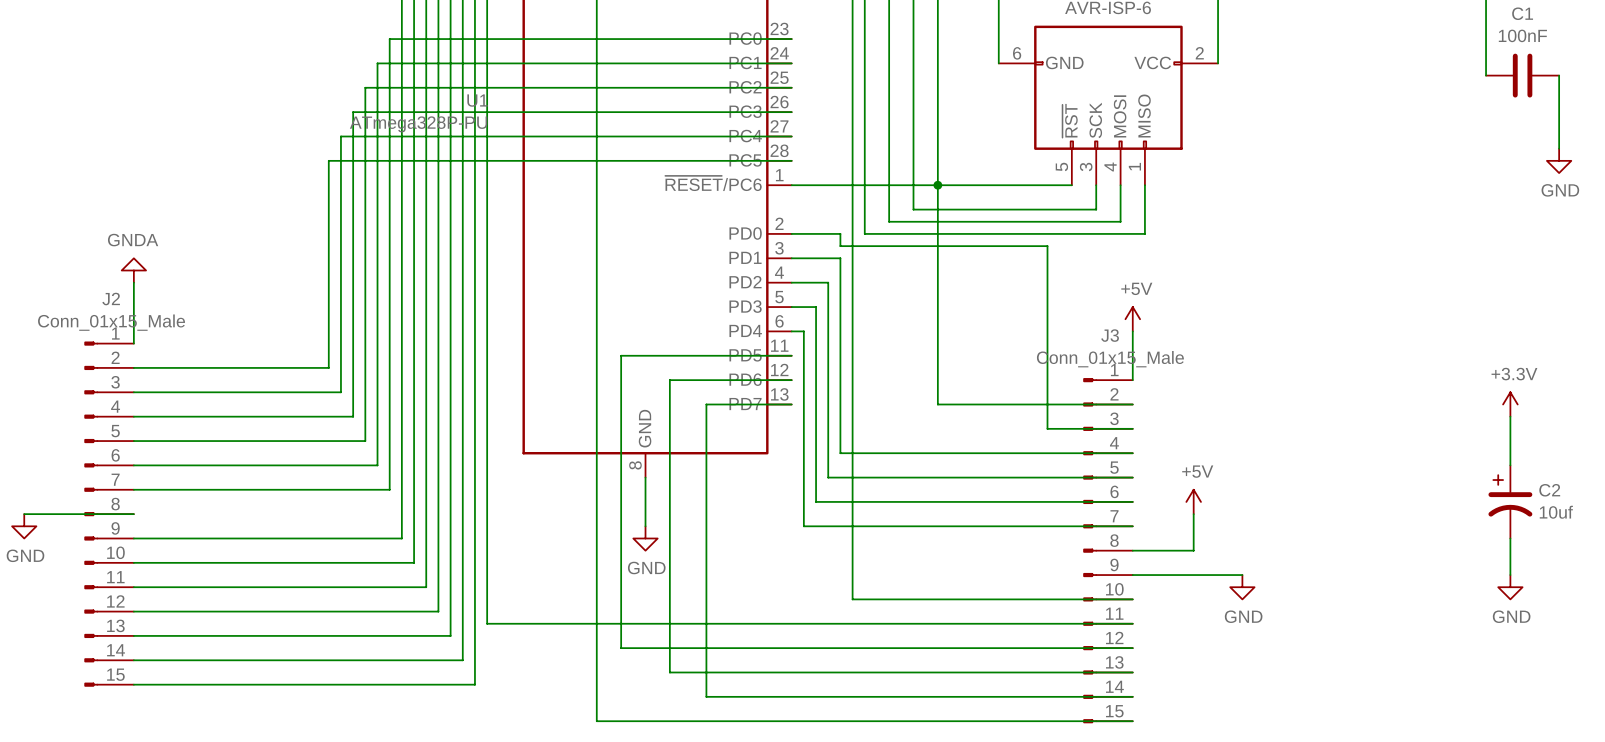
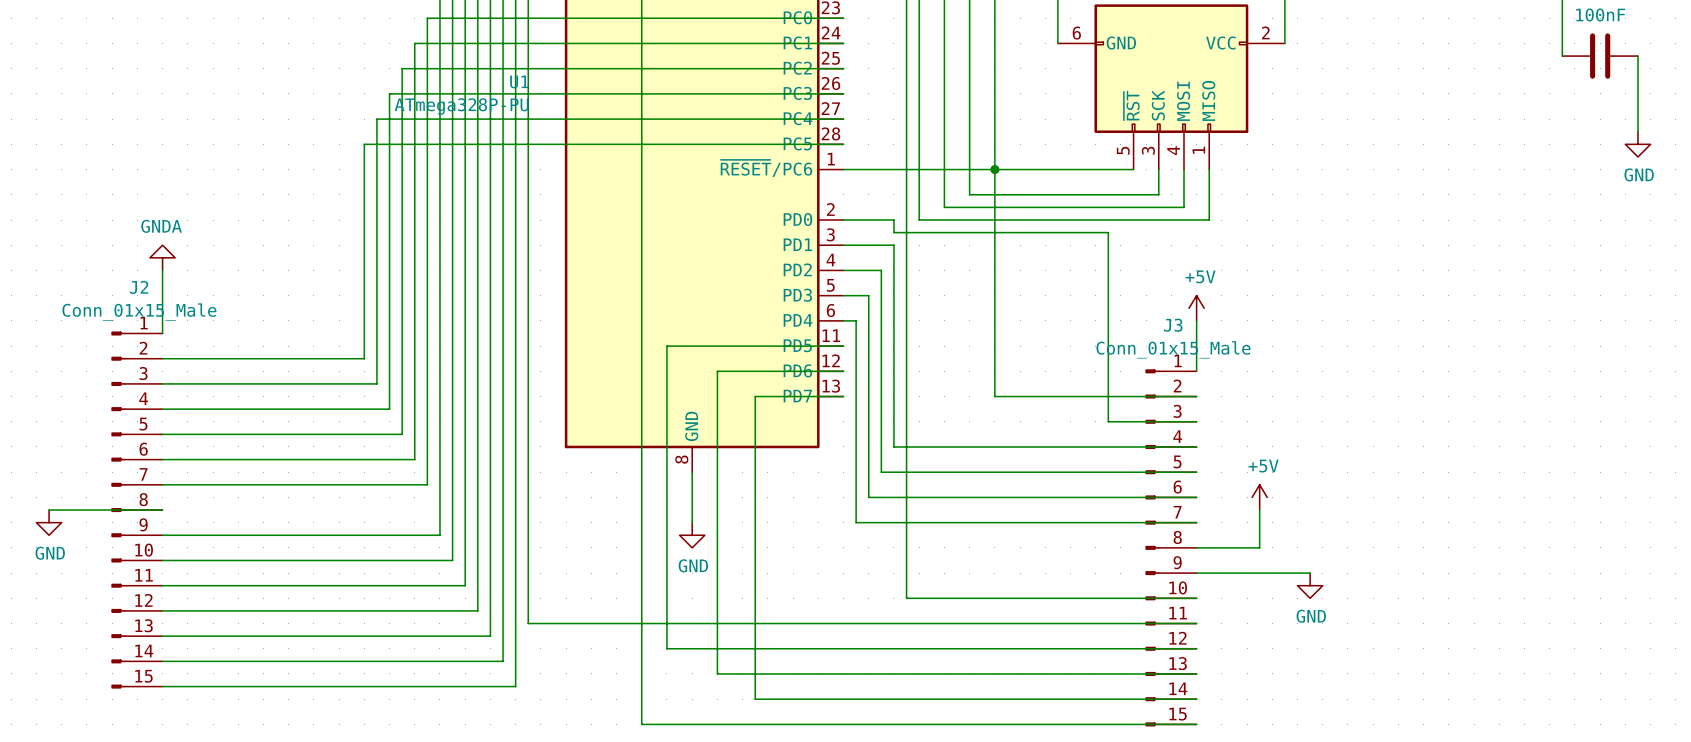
power symbol: +3.3V (1510, 404) -> none
wire: (1510, 416) (1510, 465) -> none
C2: 10uf (1510, 501) -> none
wire: (1510, 538) (1510, 575) -> none
power symbol: GND (1510, 587) -> none

